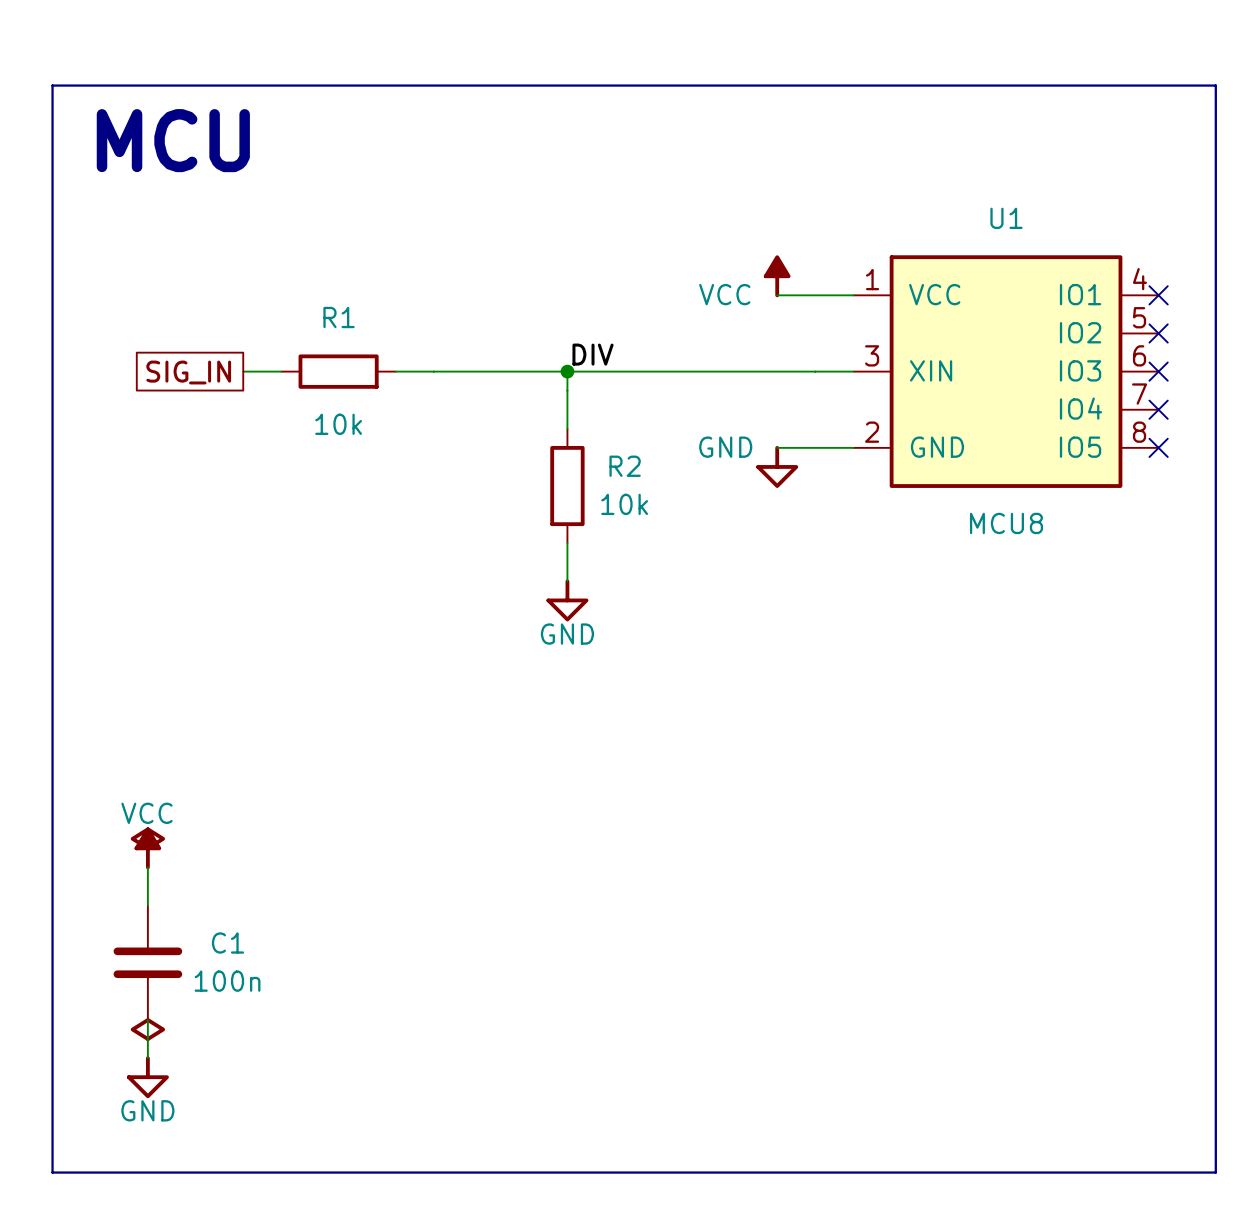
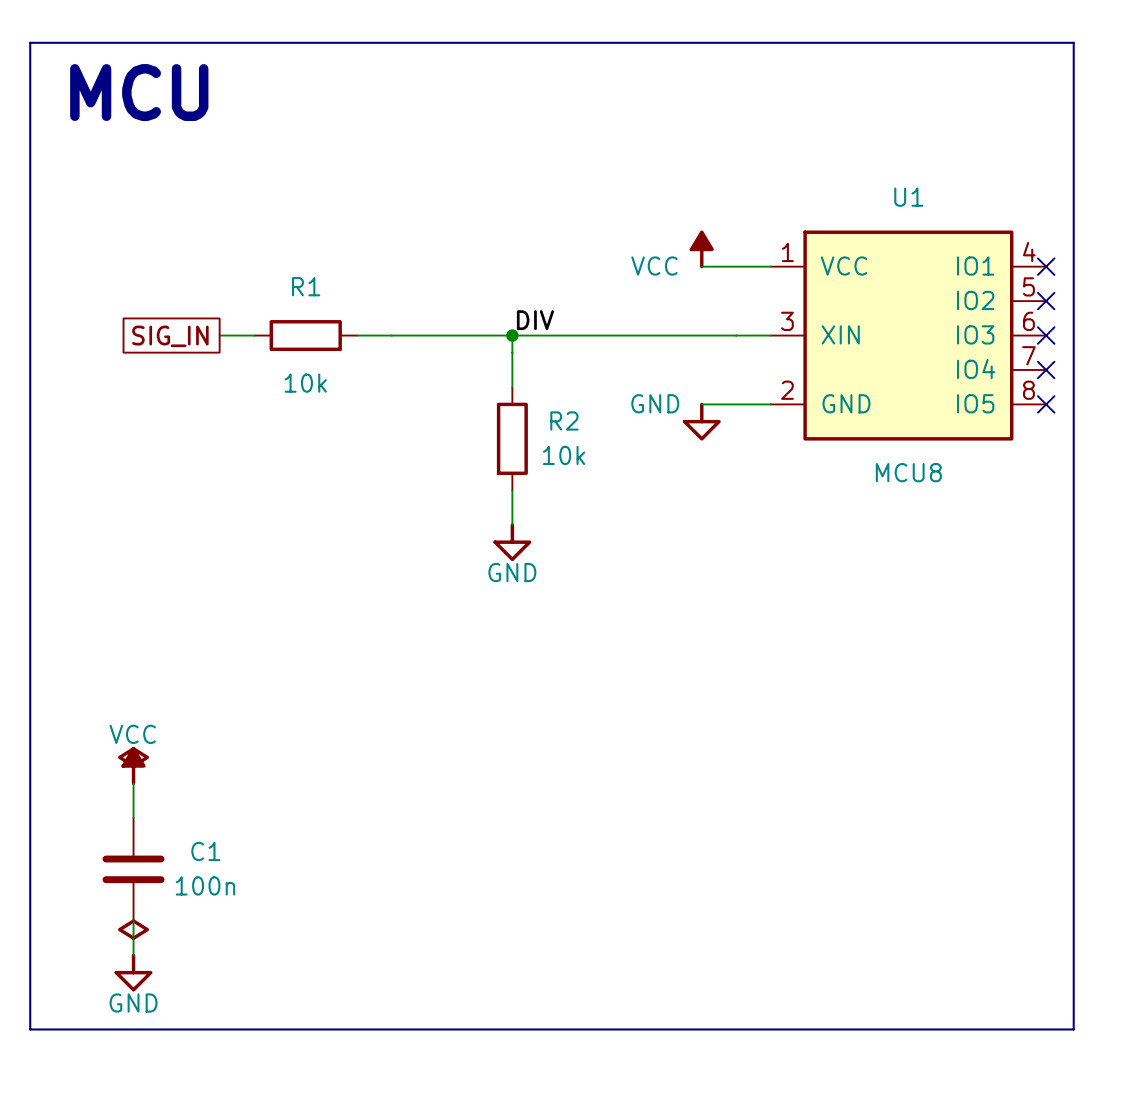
line: (52, 85) (1215, 85) (1215, 1172) (52, 1172) (52, 85) -> (30, 42) (30, 1029) (1073, 1029) (1073, 42) (30, 42)
text position: MCU (173, 140) -> MCU (139, 92)

